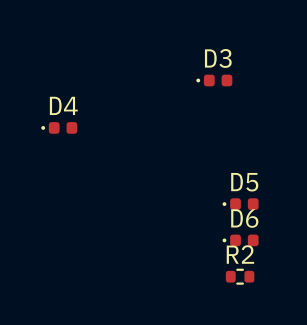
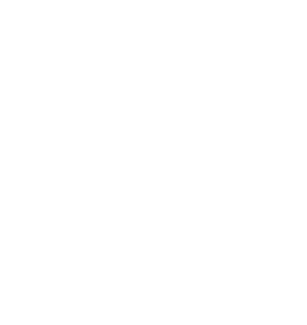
D3: (214, 80) -> none
D4: (59, 127) -> none
D5: (240, 204) -> none
D6: (240, 240) -> none
R2: (240, 276) -> none

